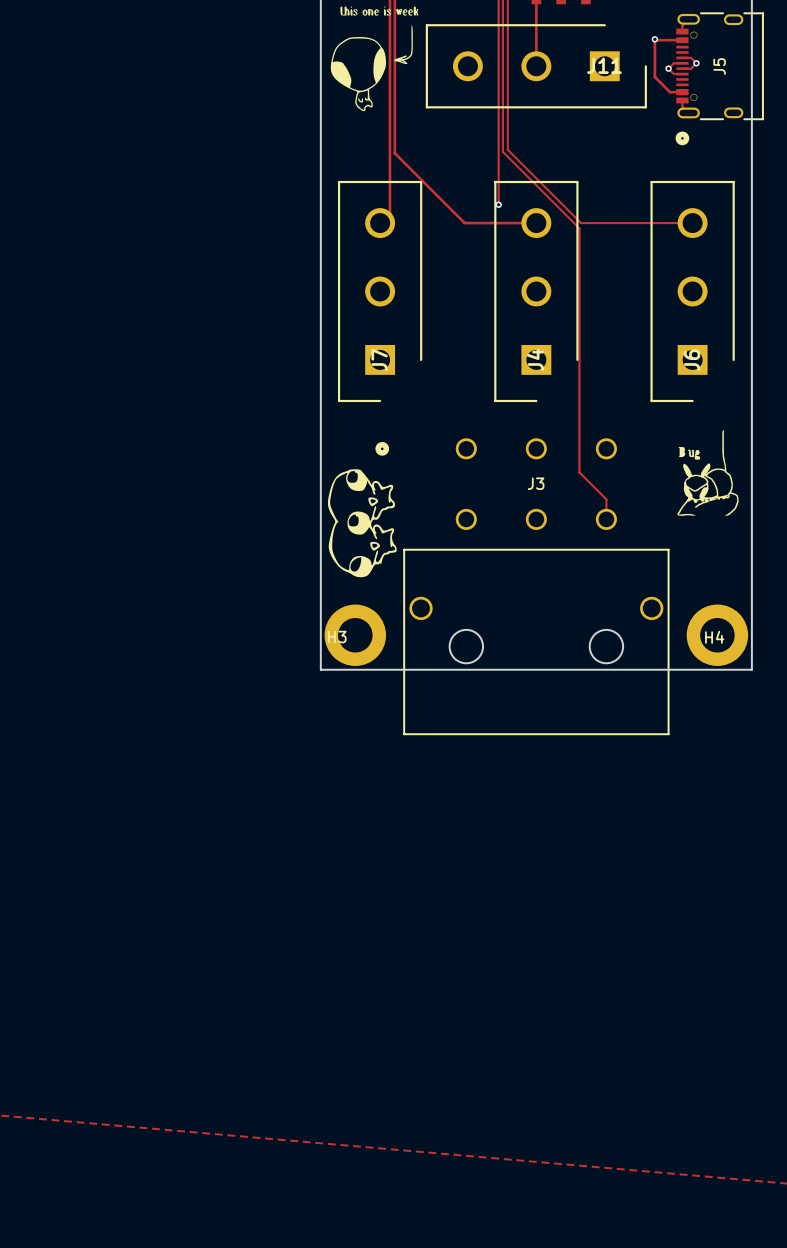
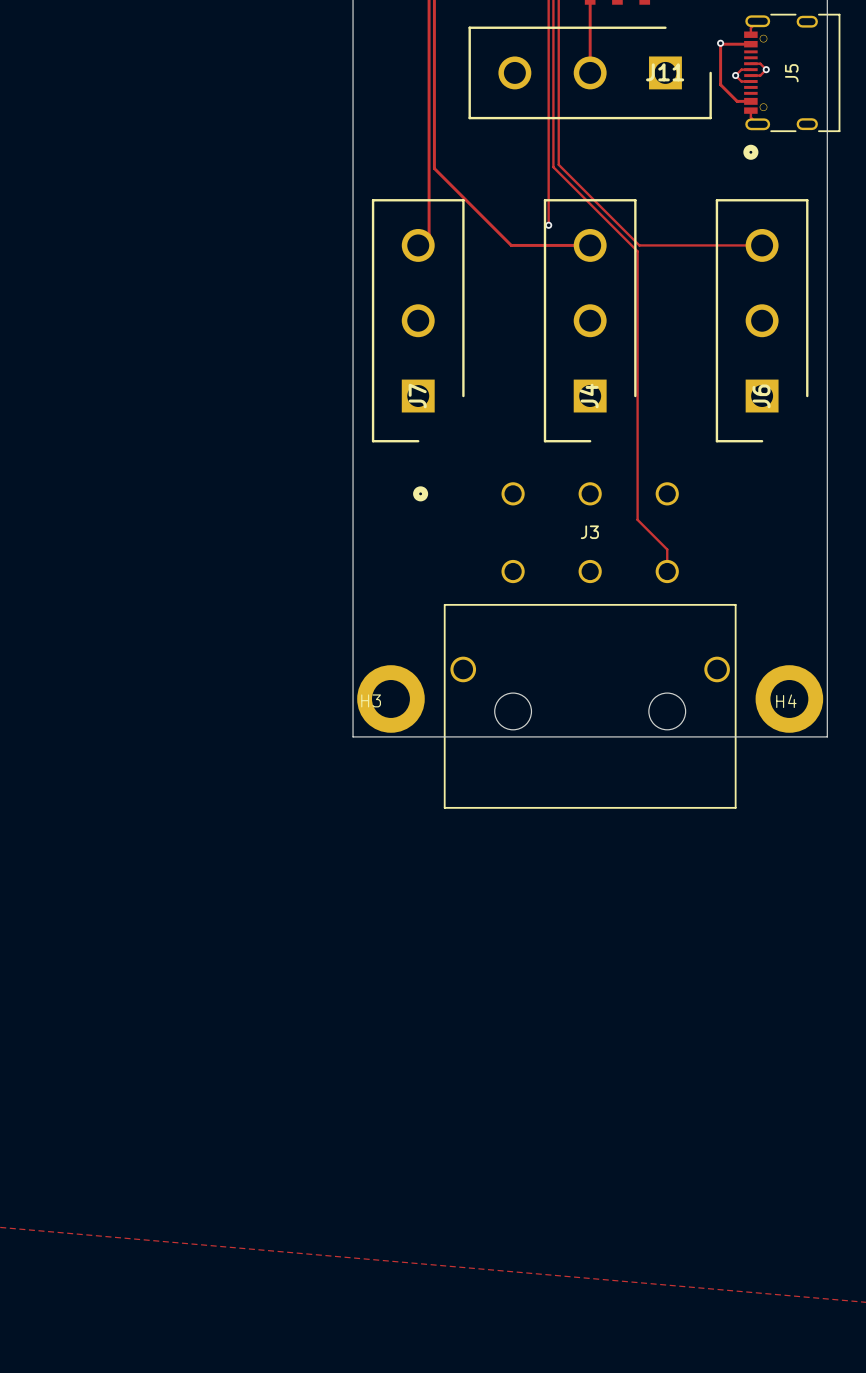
drawing: [330, 6, 419, 112] -> none
drawing: [677, 430, 739, 516] -> none
drawing: [327, 469, 397, 578] -> none

